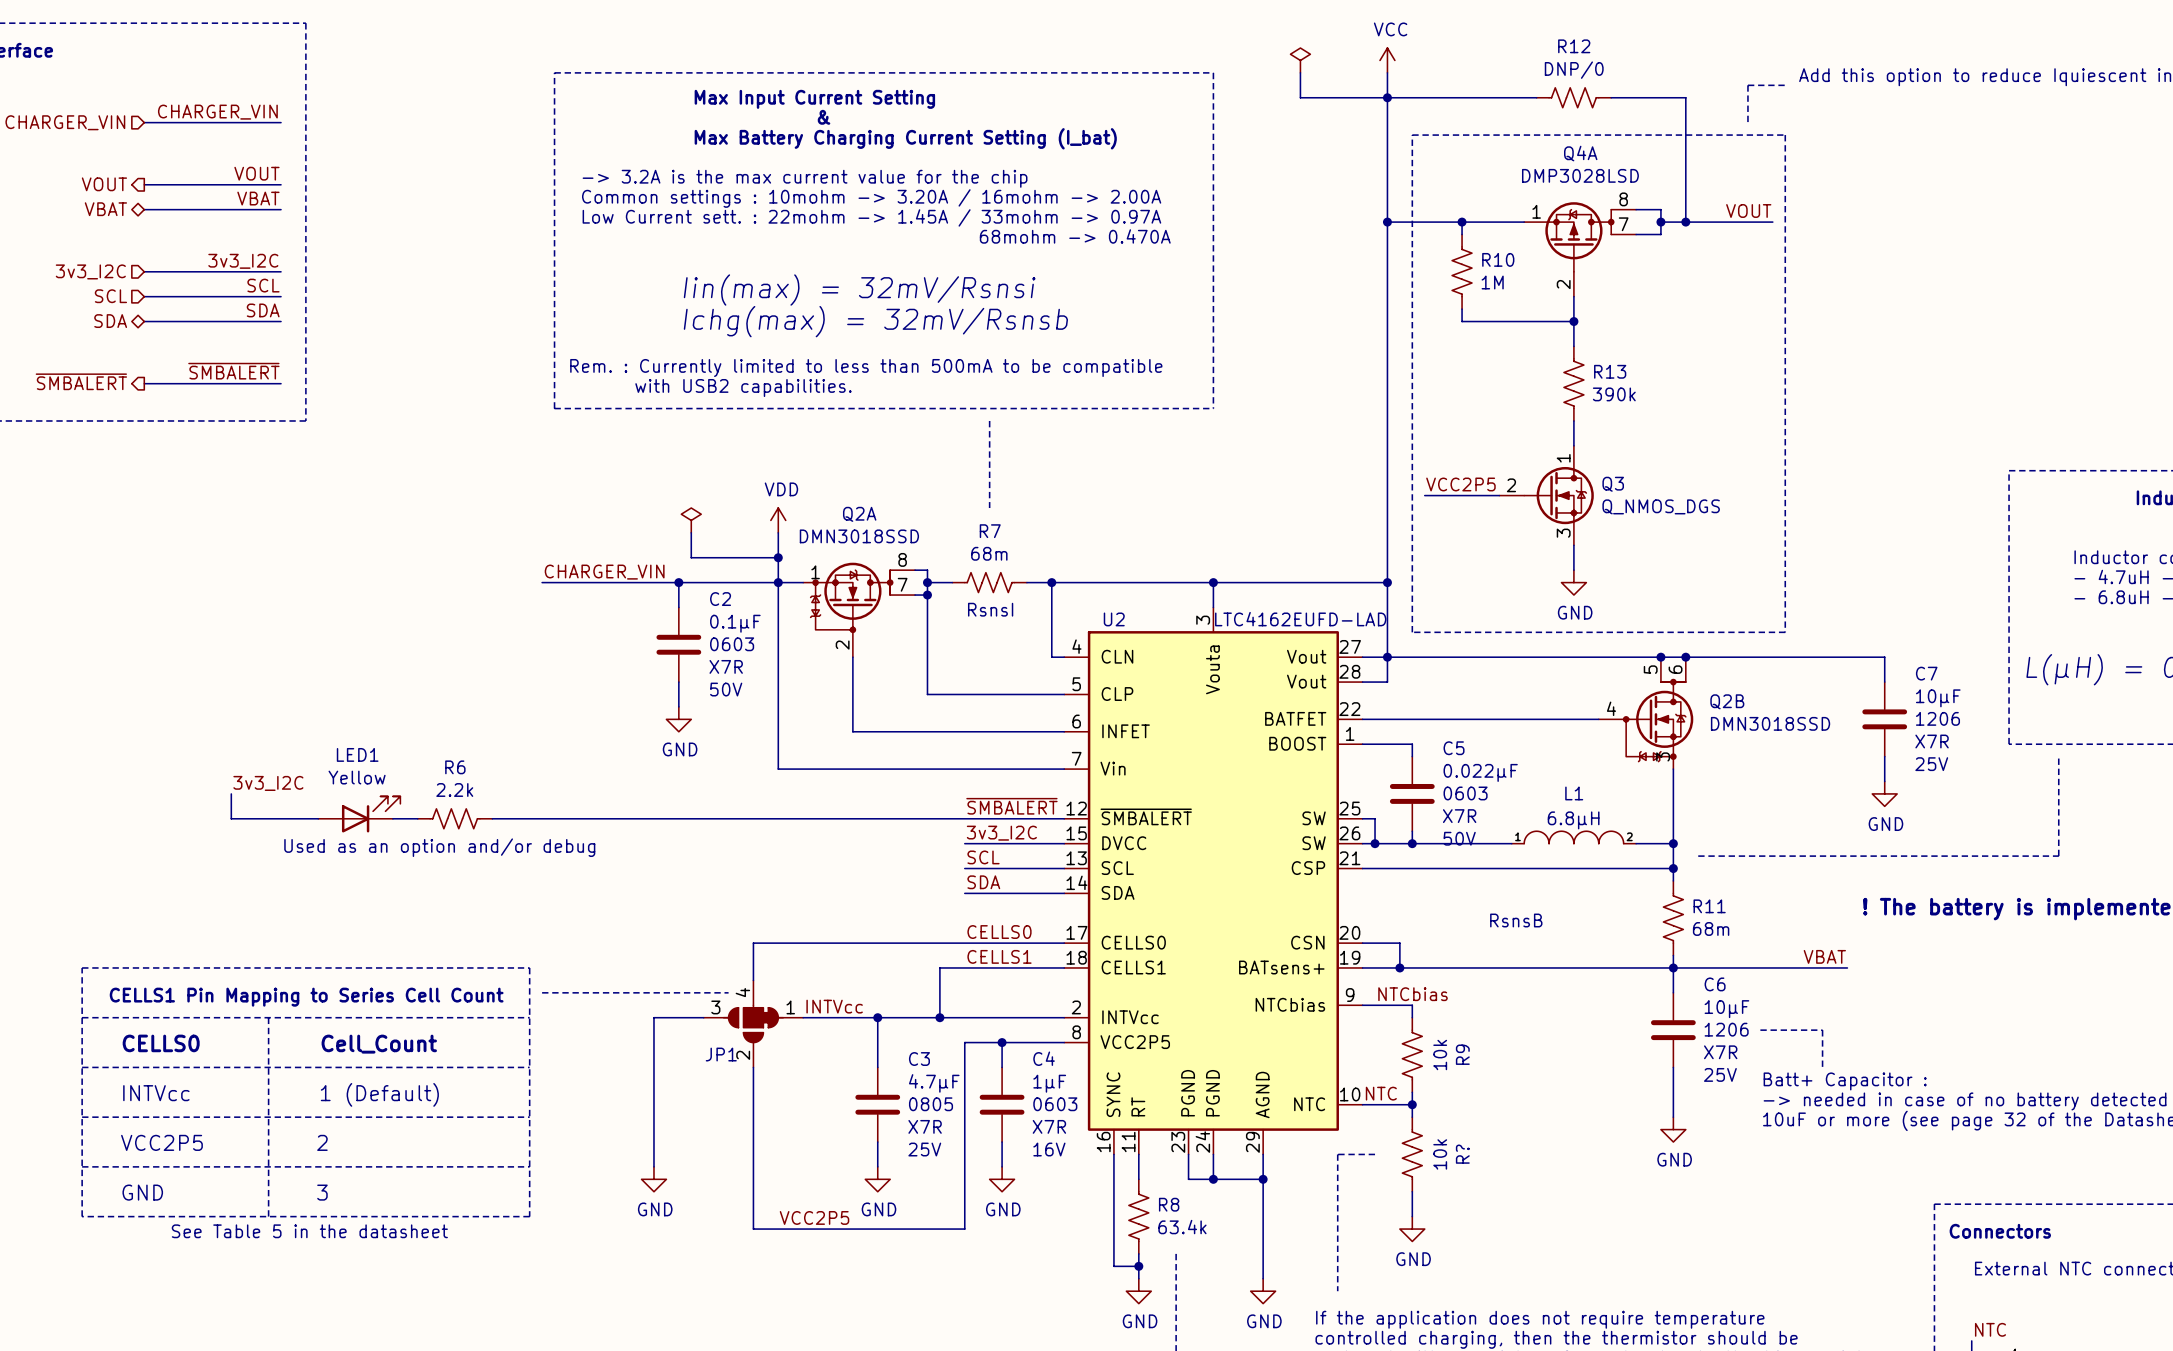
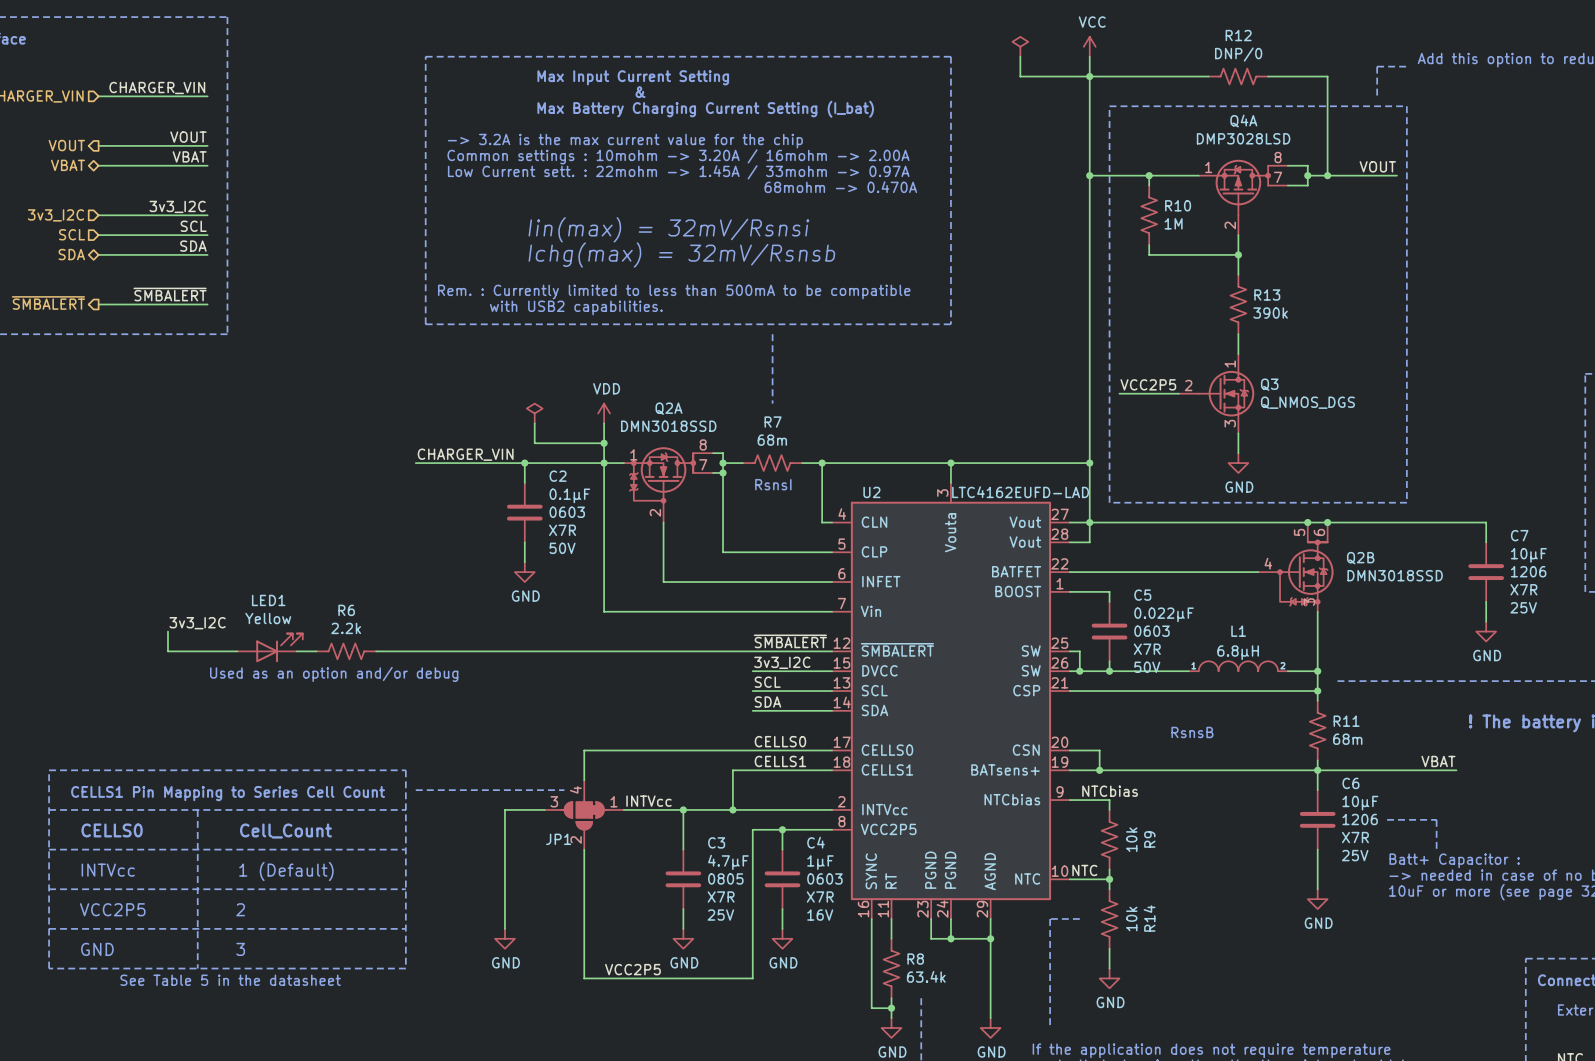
R? name: R? (1462, 1154) -> R14 (1149, 918)

